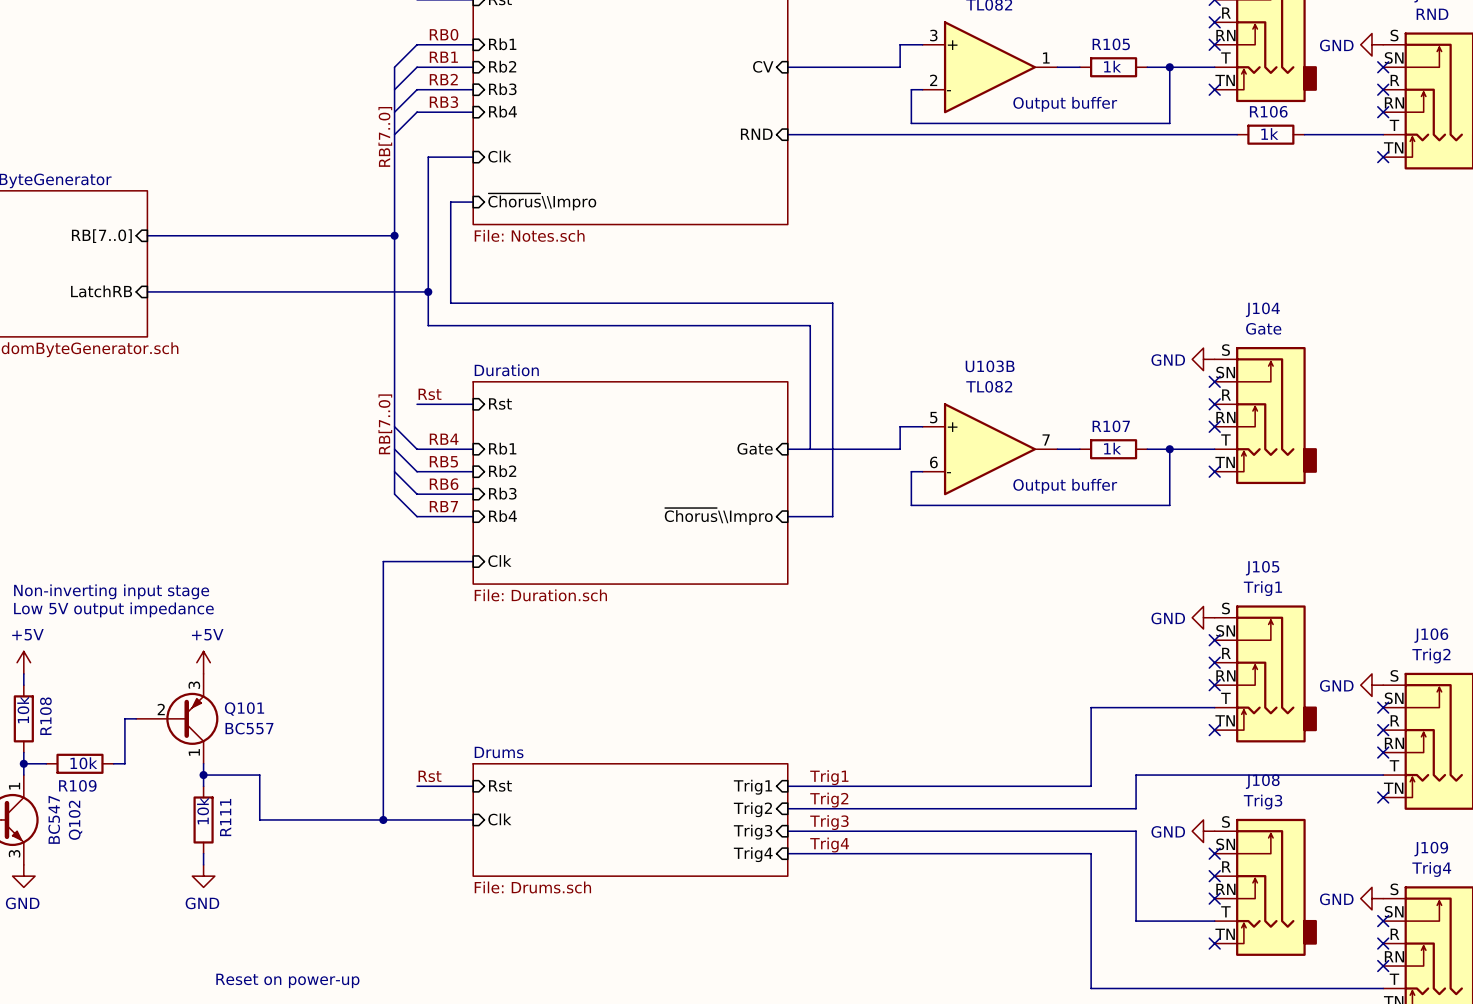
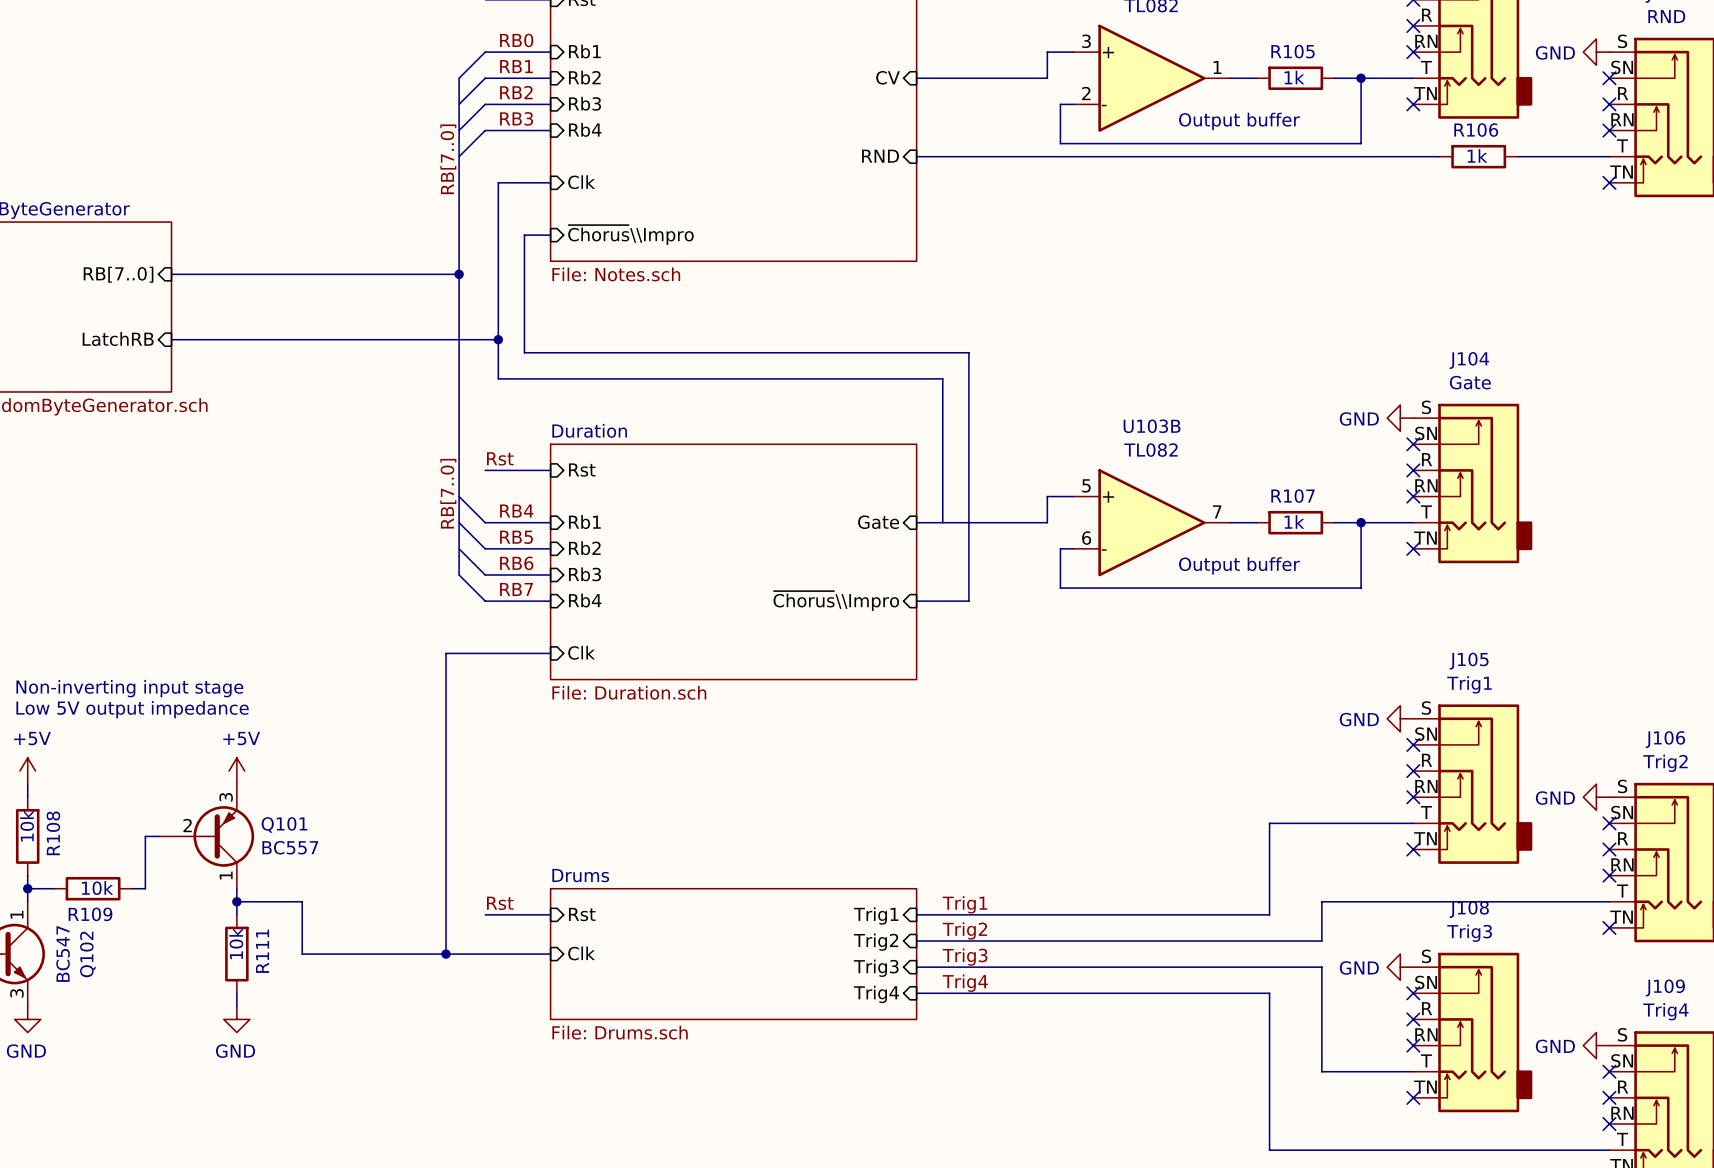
text: Reset on power-up (287, 980) -> none

